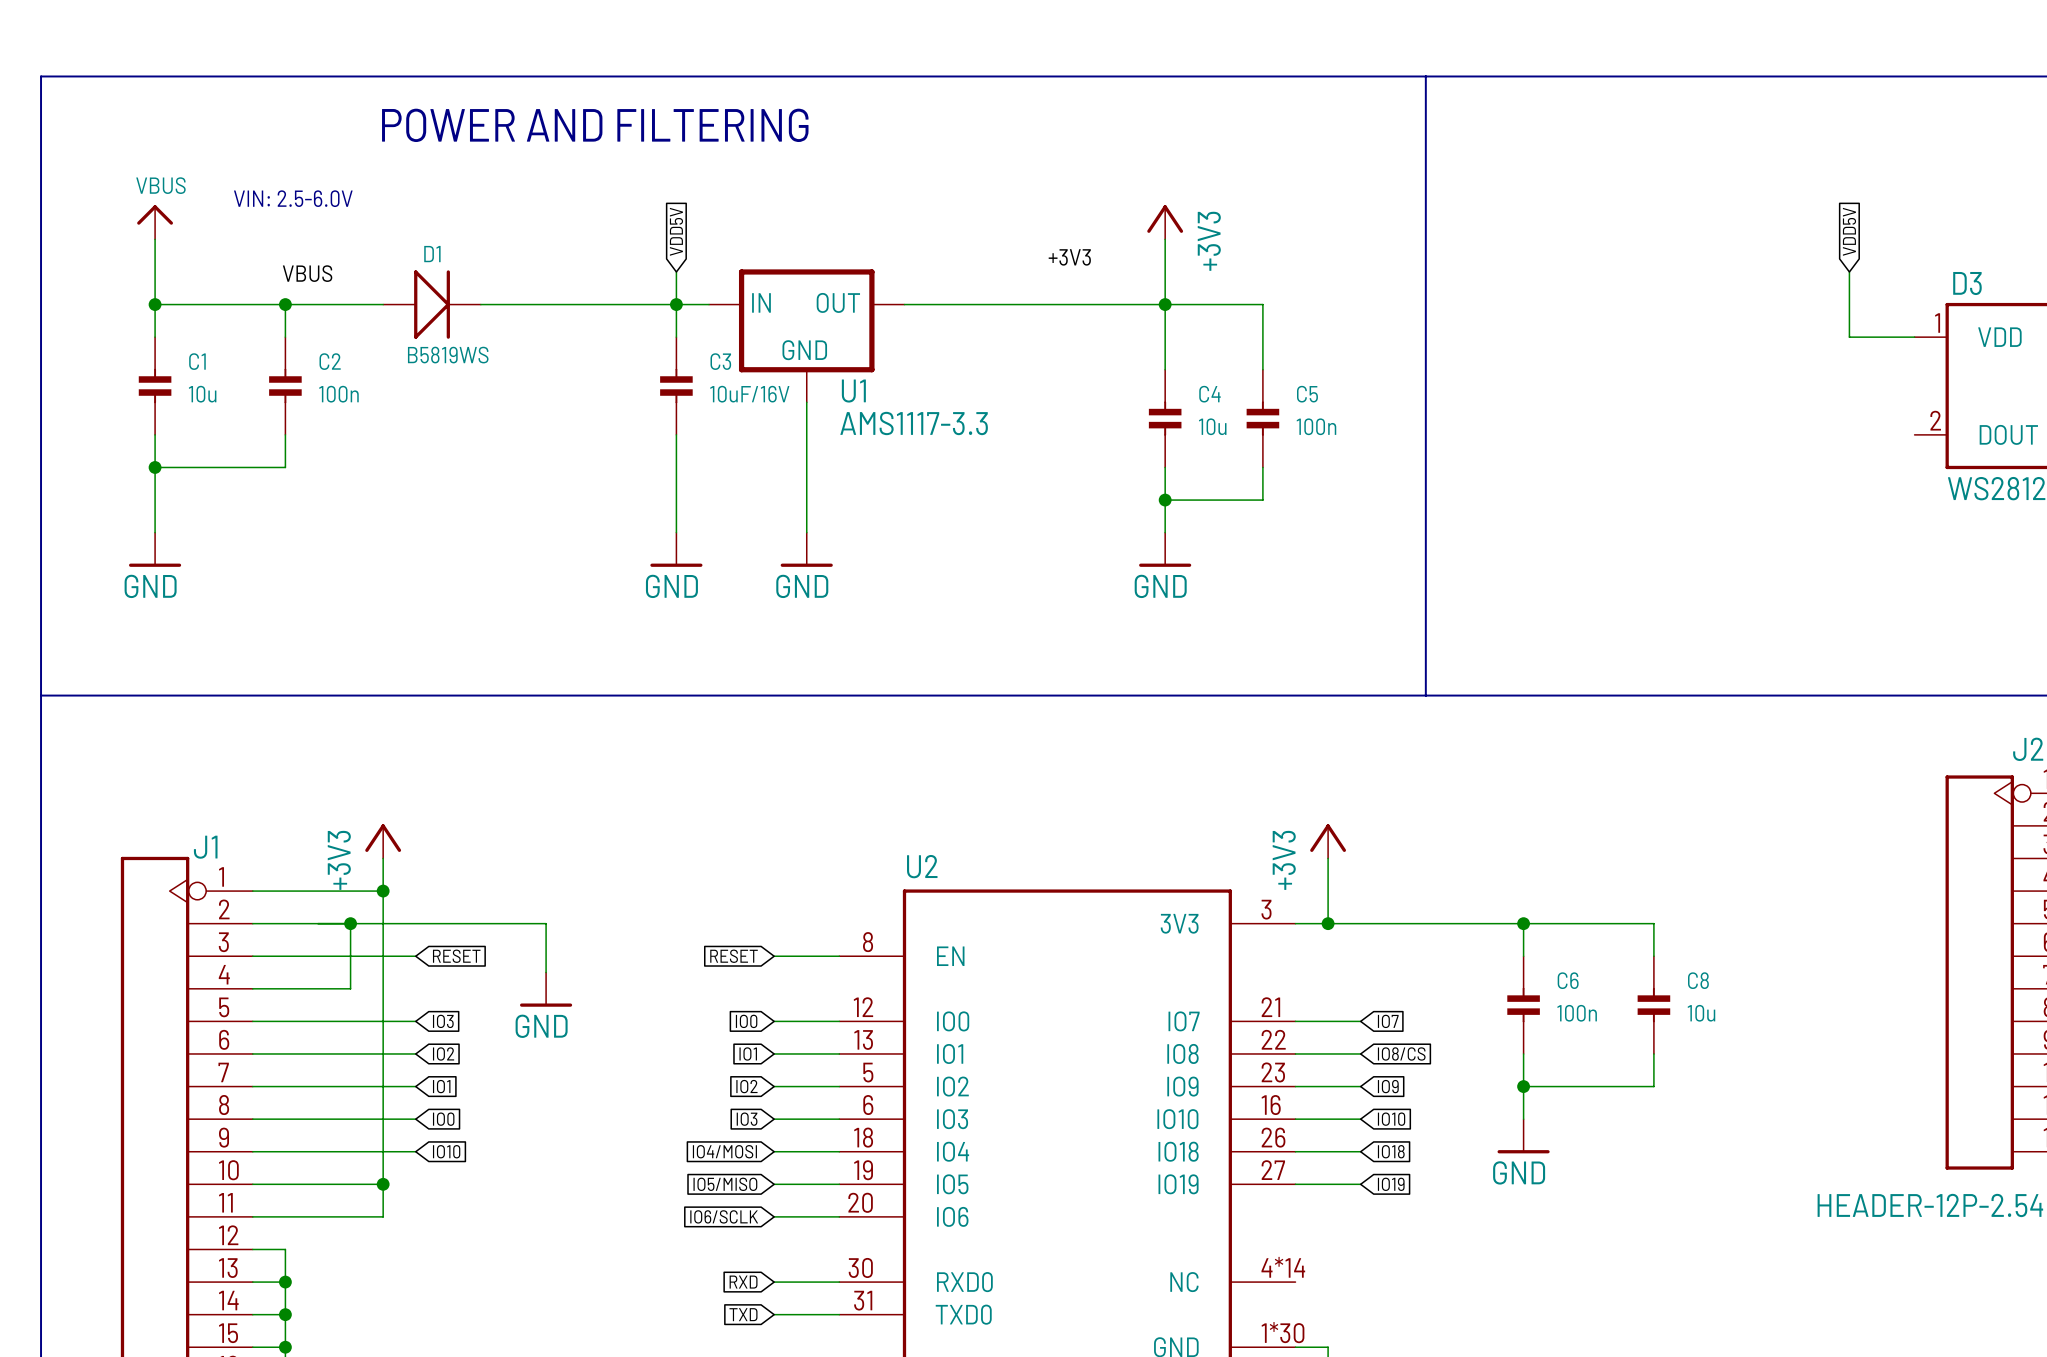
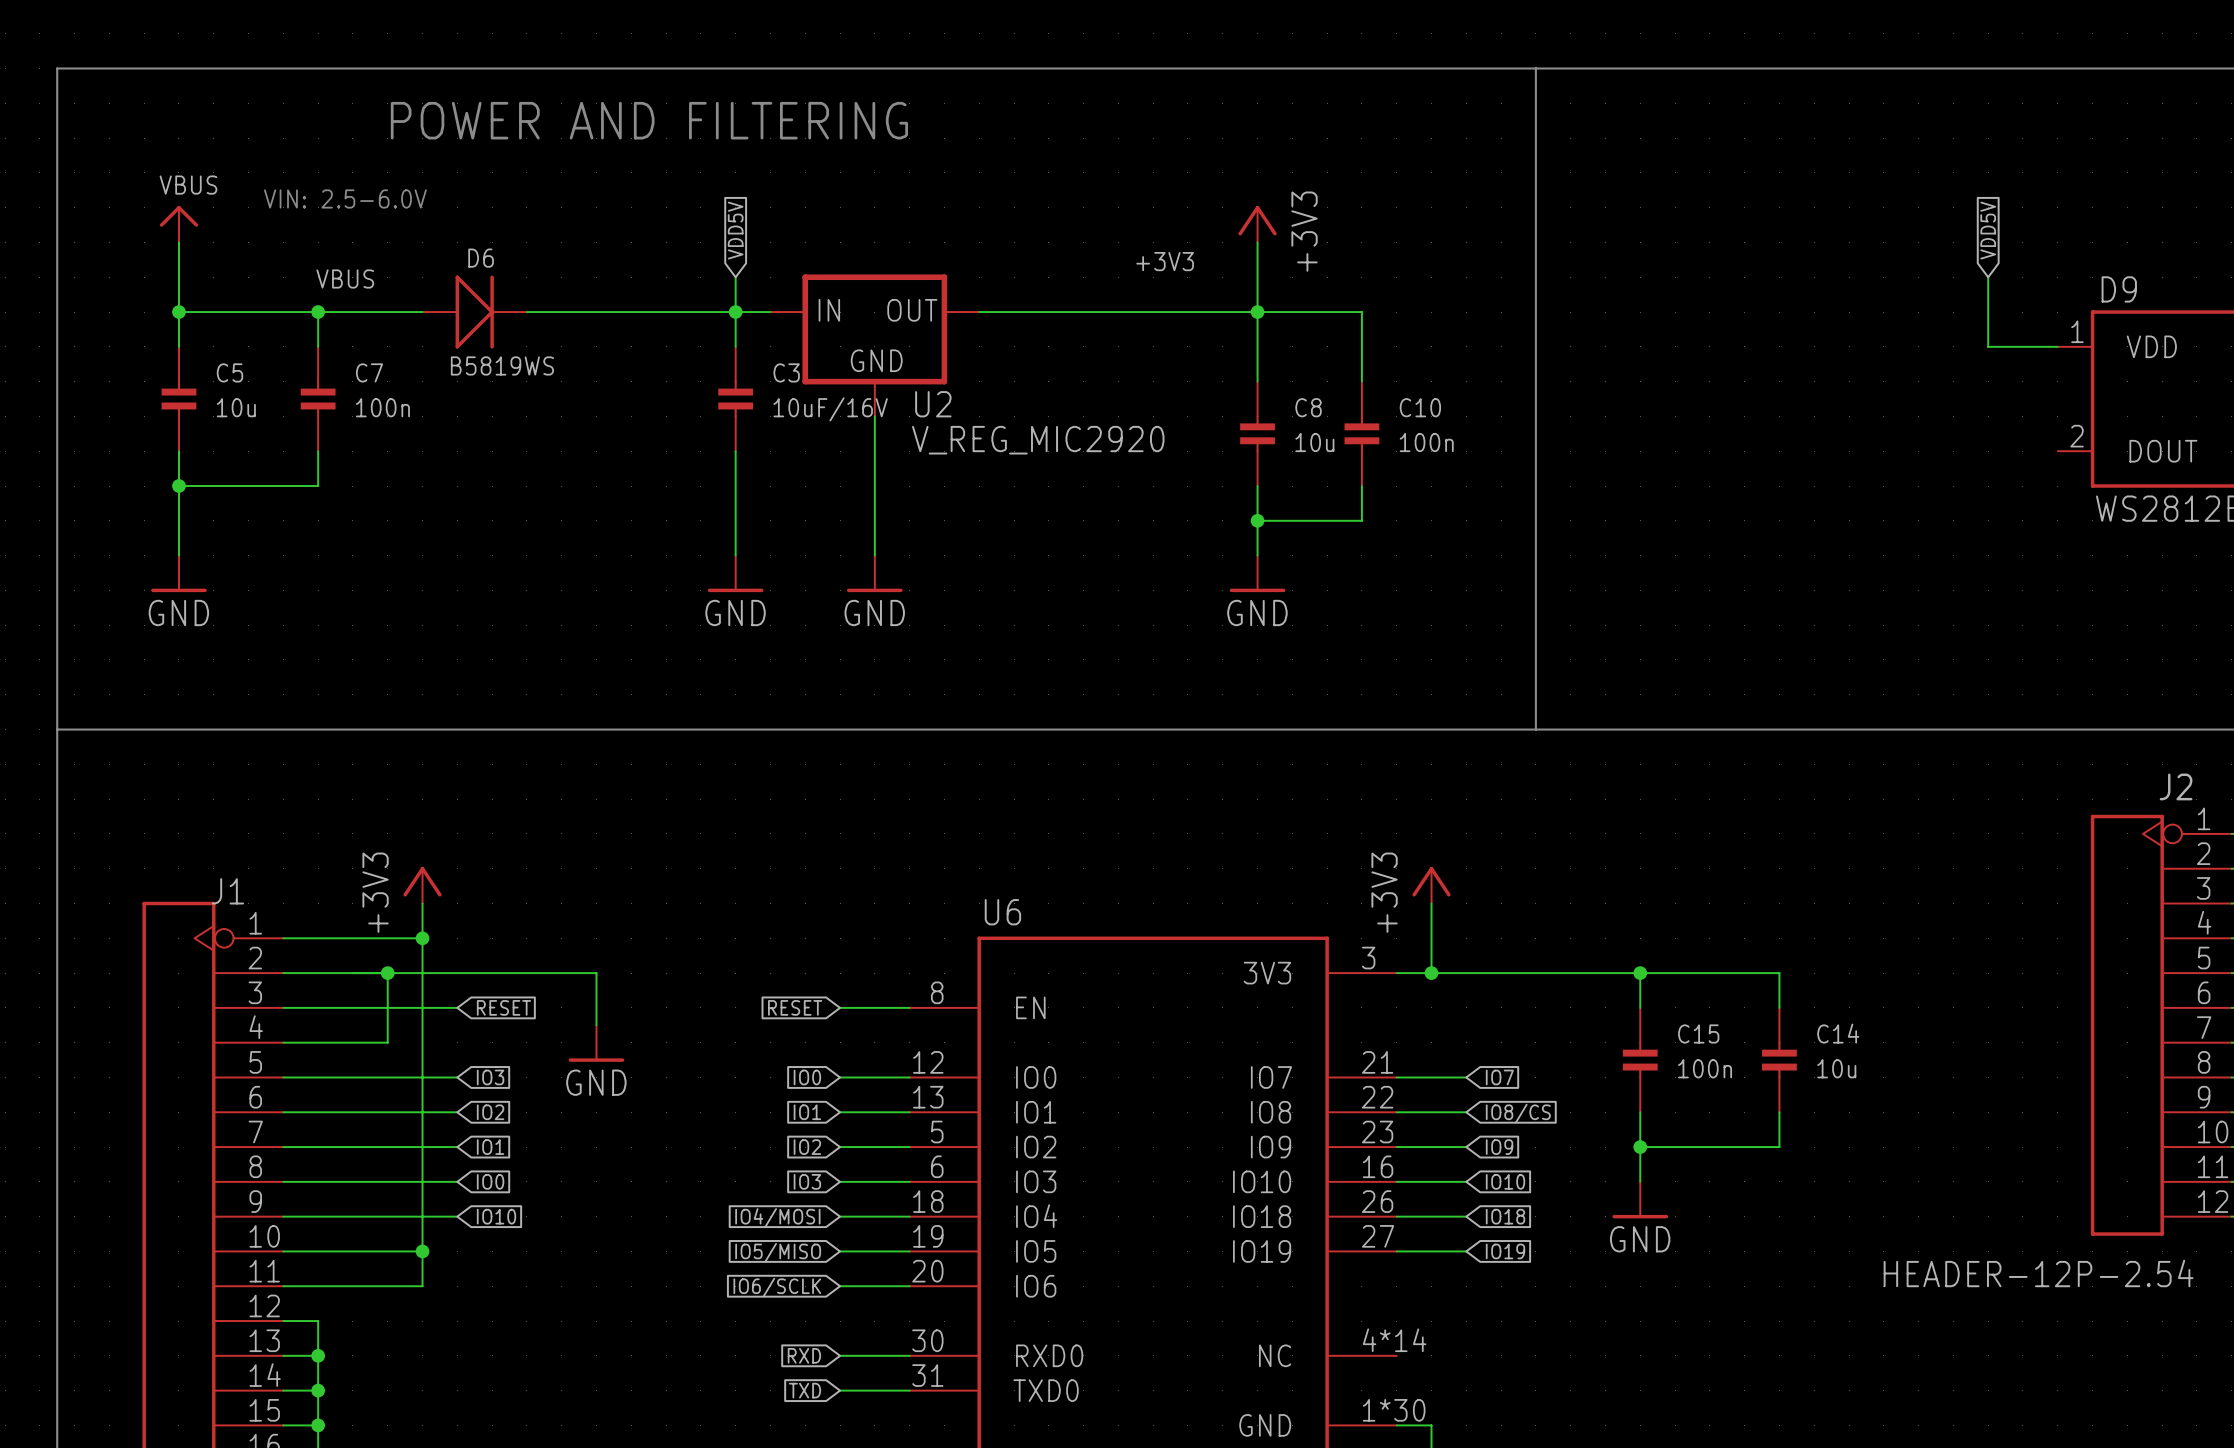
D1 name: D1 (432, 254) -> D6 (481, 258)
D3 name: D3 (1967, 283) -> D9 (2119, 289)
C1 name: C1 (197, 361) -> C5 (229, 372)
C2 name: C2 (330, 361) -> C7 (369, 372)
U1 name: U1 (853, 391) -> U2 (933, 404)
C4 name: C4 (1209, 394) -> C8 (1308, 407)
C5 name: C5 (1307, 394) -> C10 (1420, 407)
U1 value: AMS1117-3.3 (914, 423) -> V_REG_MIC2920 (1038, 440)
U2 name: U2 (922, 866) -> U6 (1002, 912)
C6 name: C6 (1568, 980) -> C15 (1698, 1033)
C8 name: C8 (1698, 980) -> C14 (1838, 1033)

